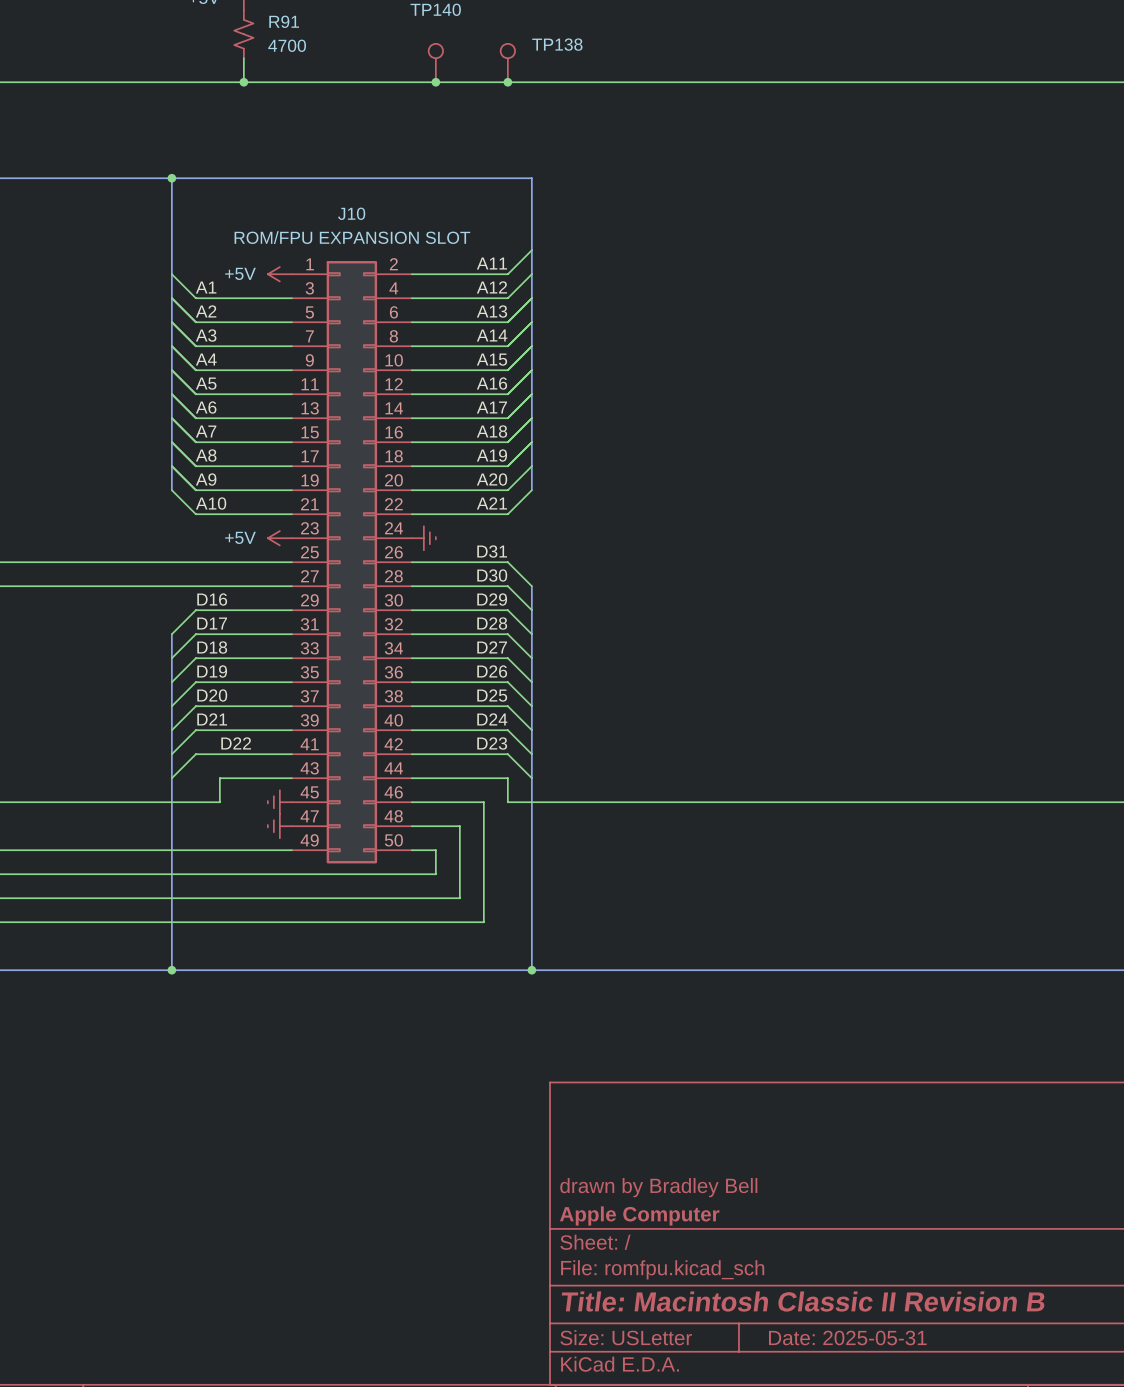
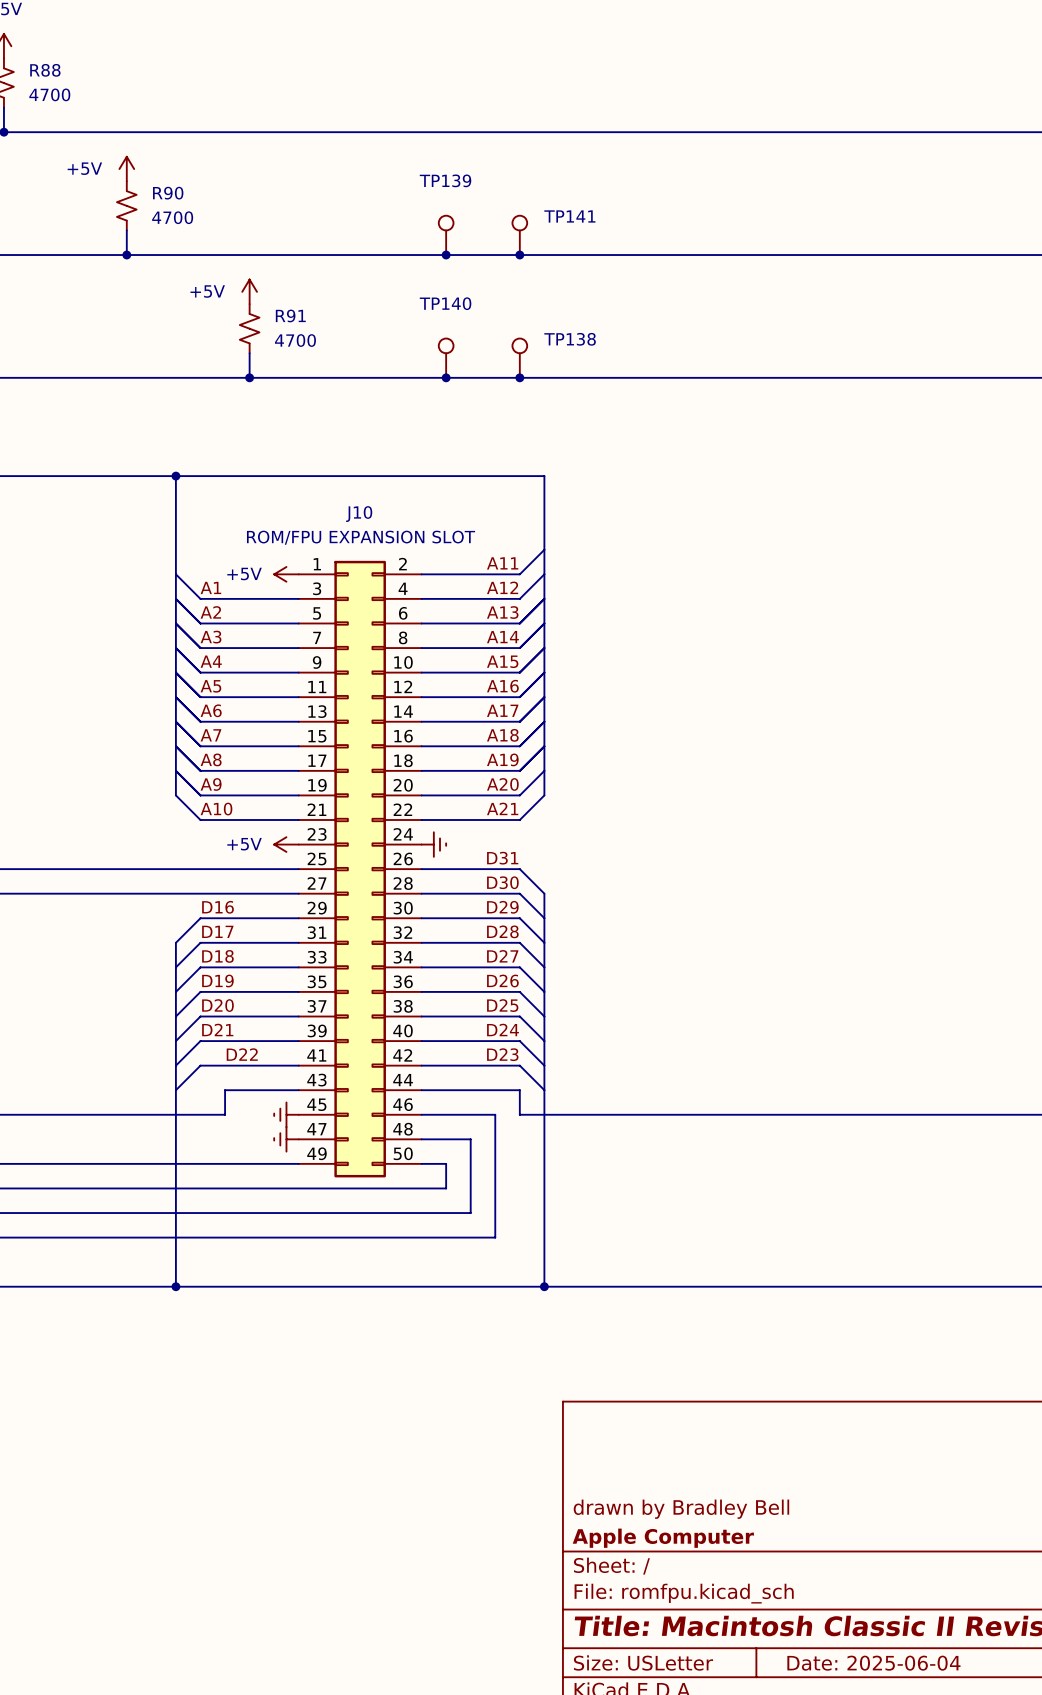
title block: Date: 2025-05-31 (847, 1337) -> Date: 2025-06-04 (873, 1663)

